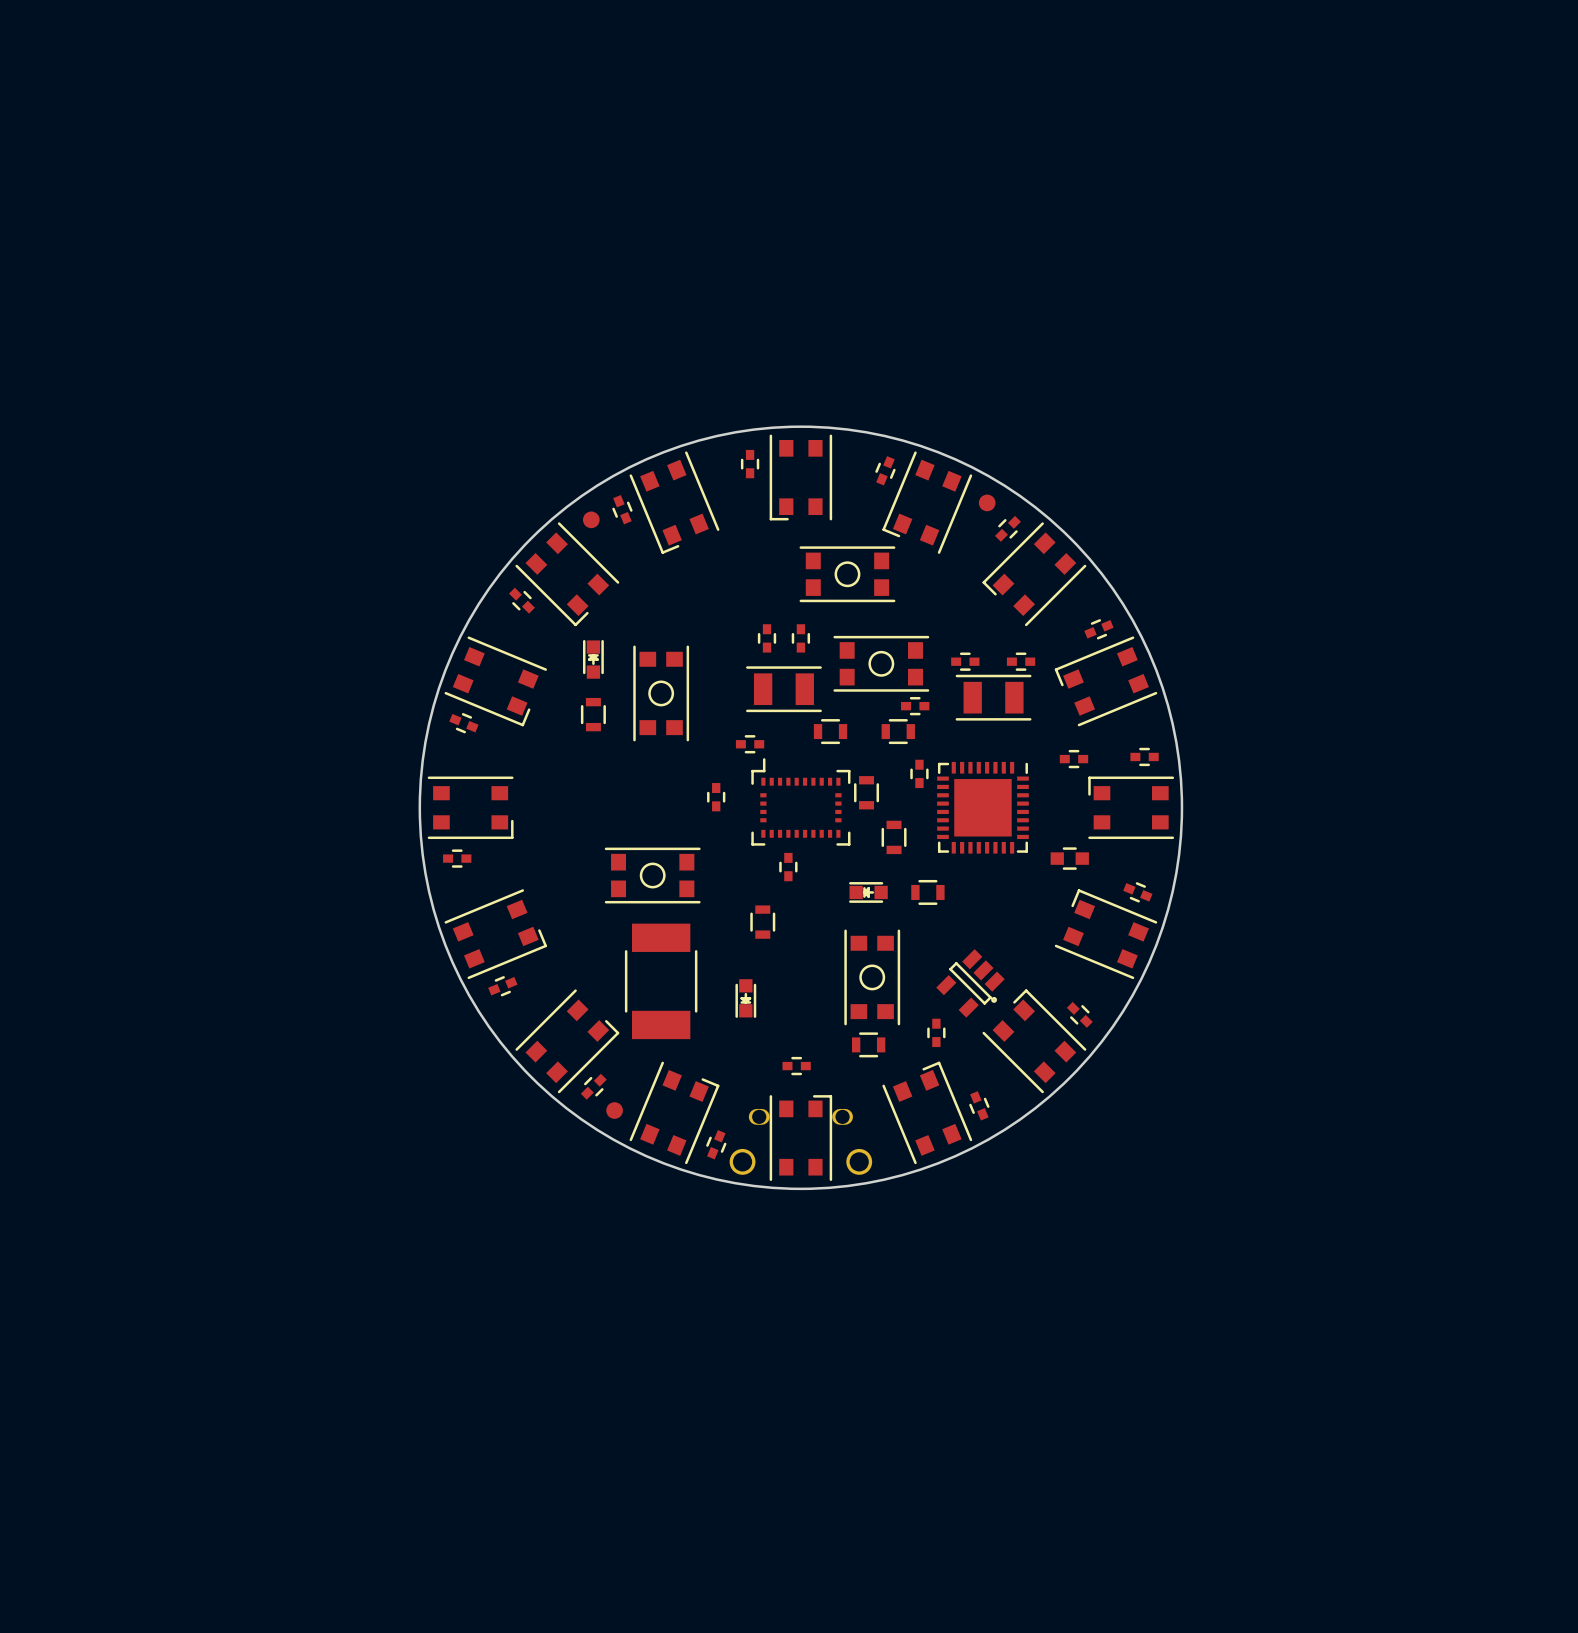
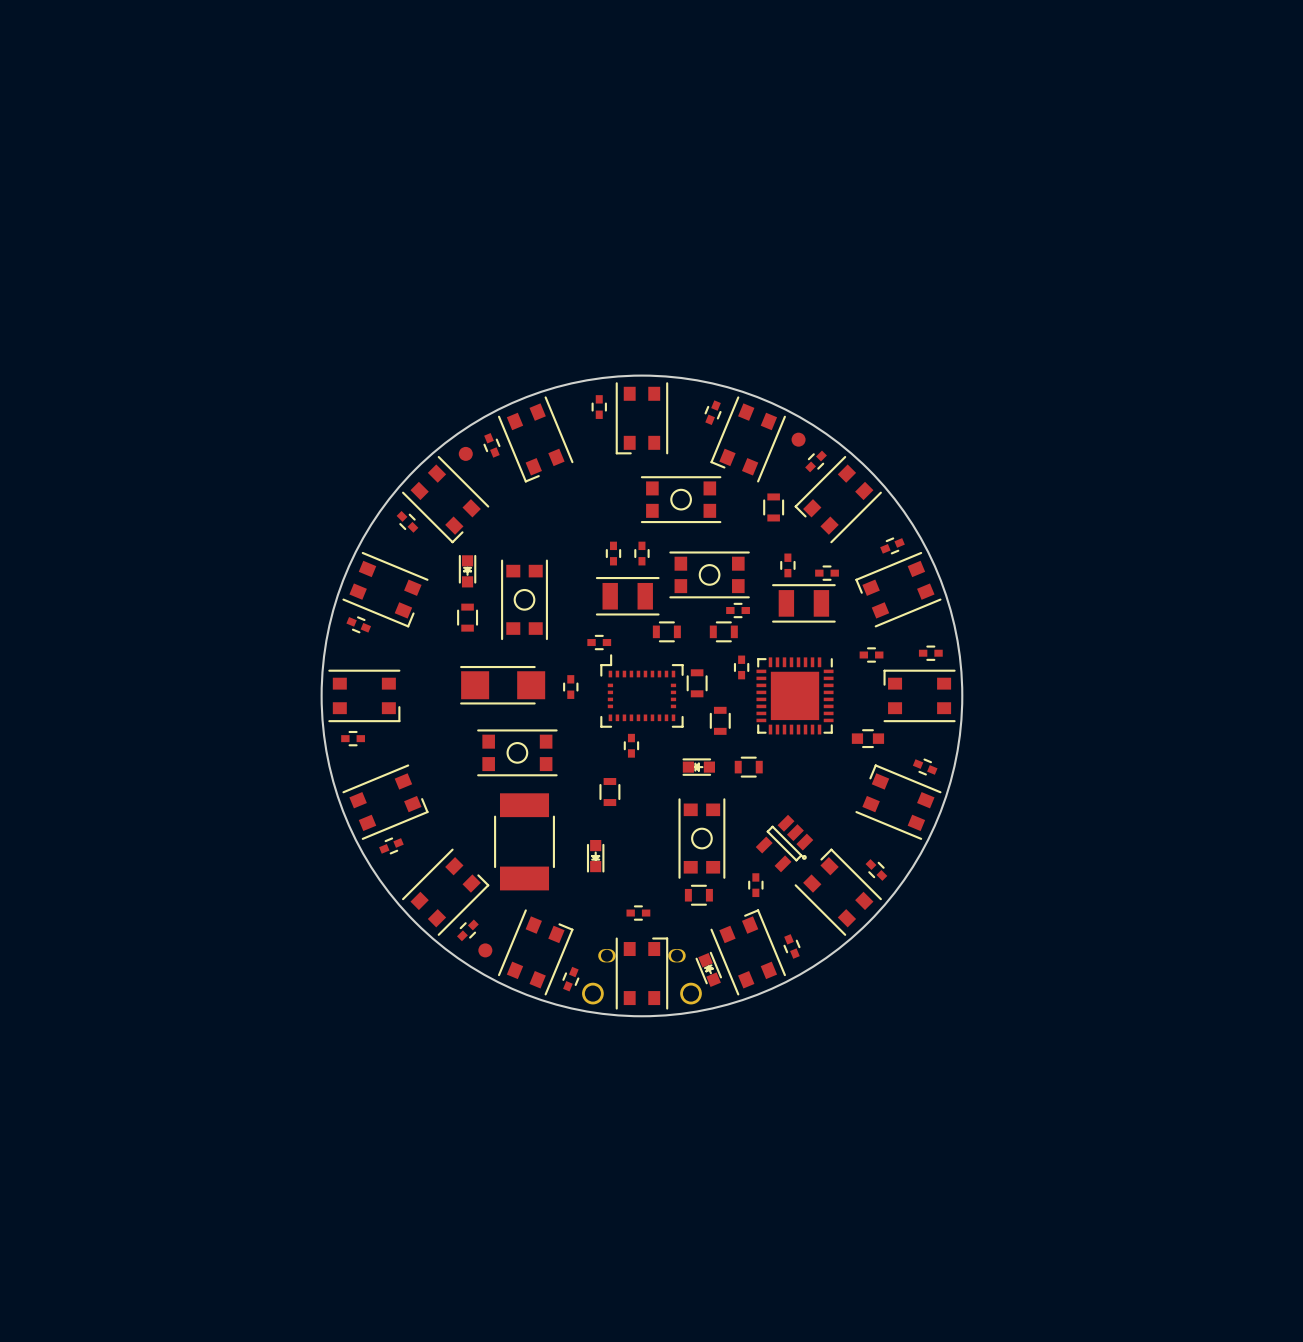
part: none -> (773, 507)
part rotation: 0° (965, 661) -> 90° clockwise (787, 565)
part: none -> (502, 685)
part: none -> (708, 969)

